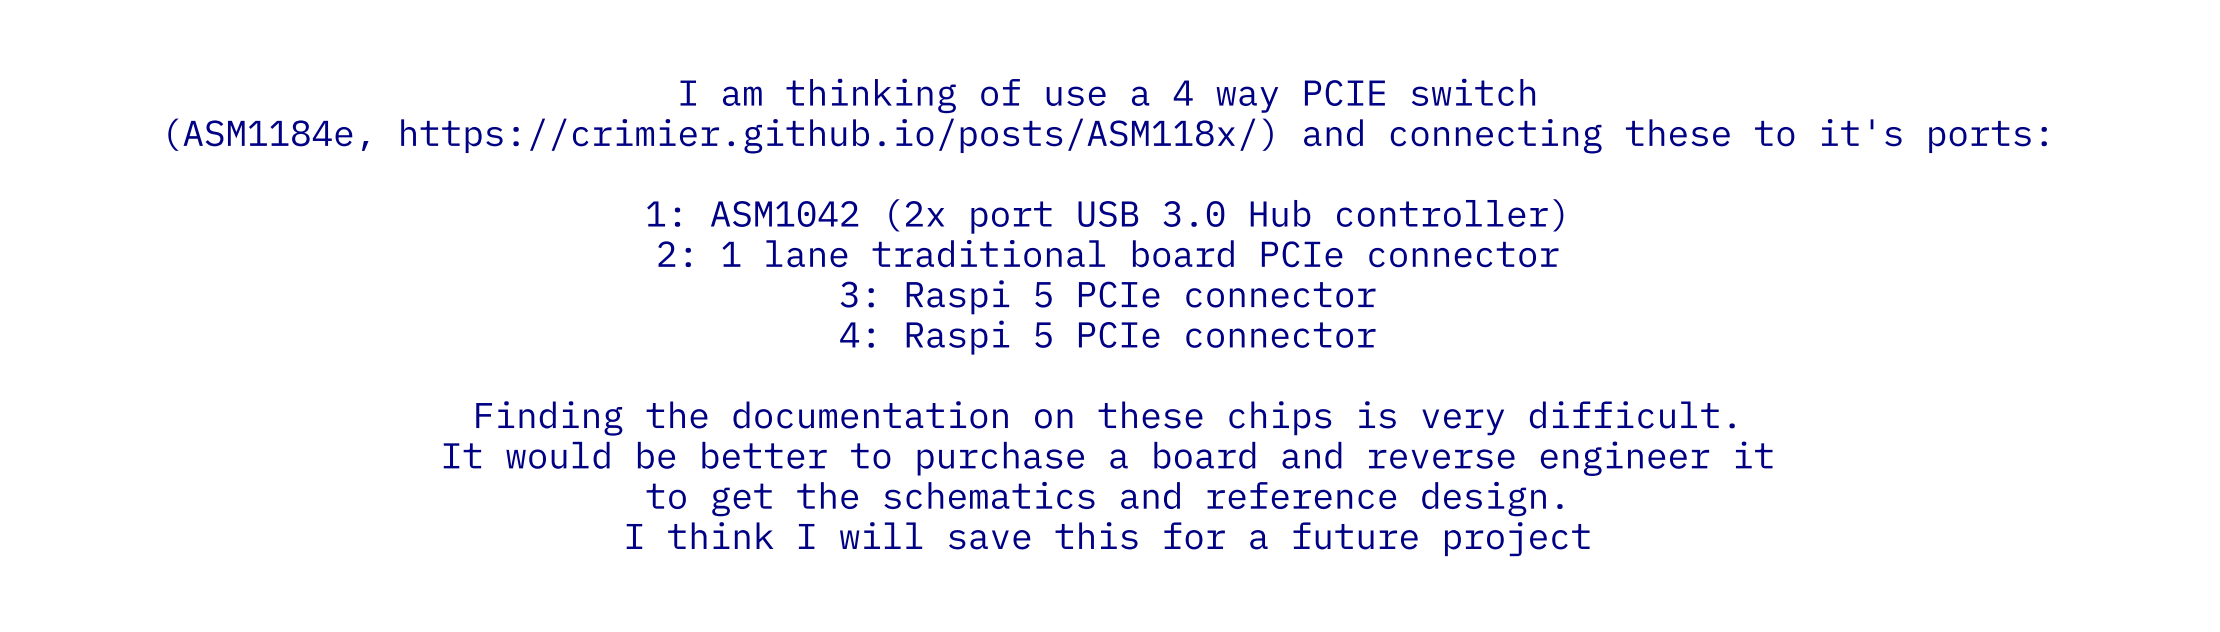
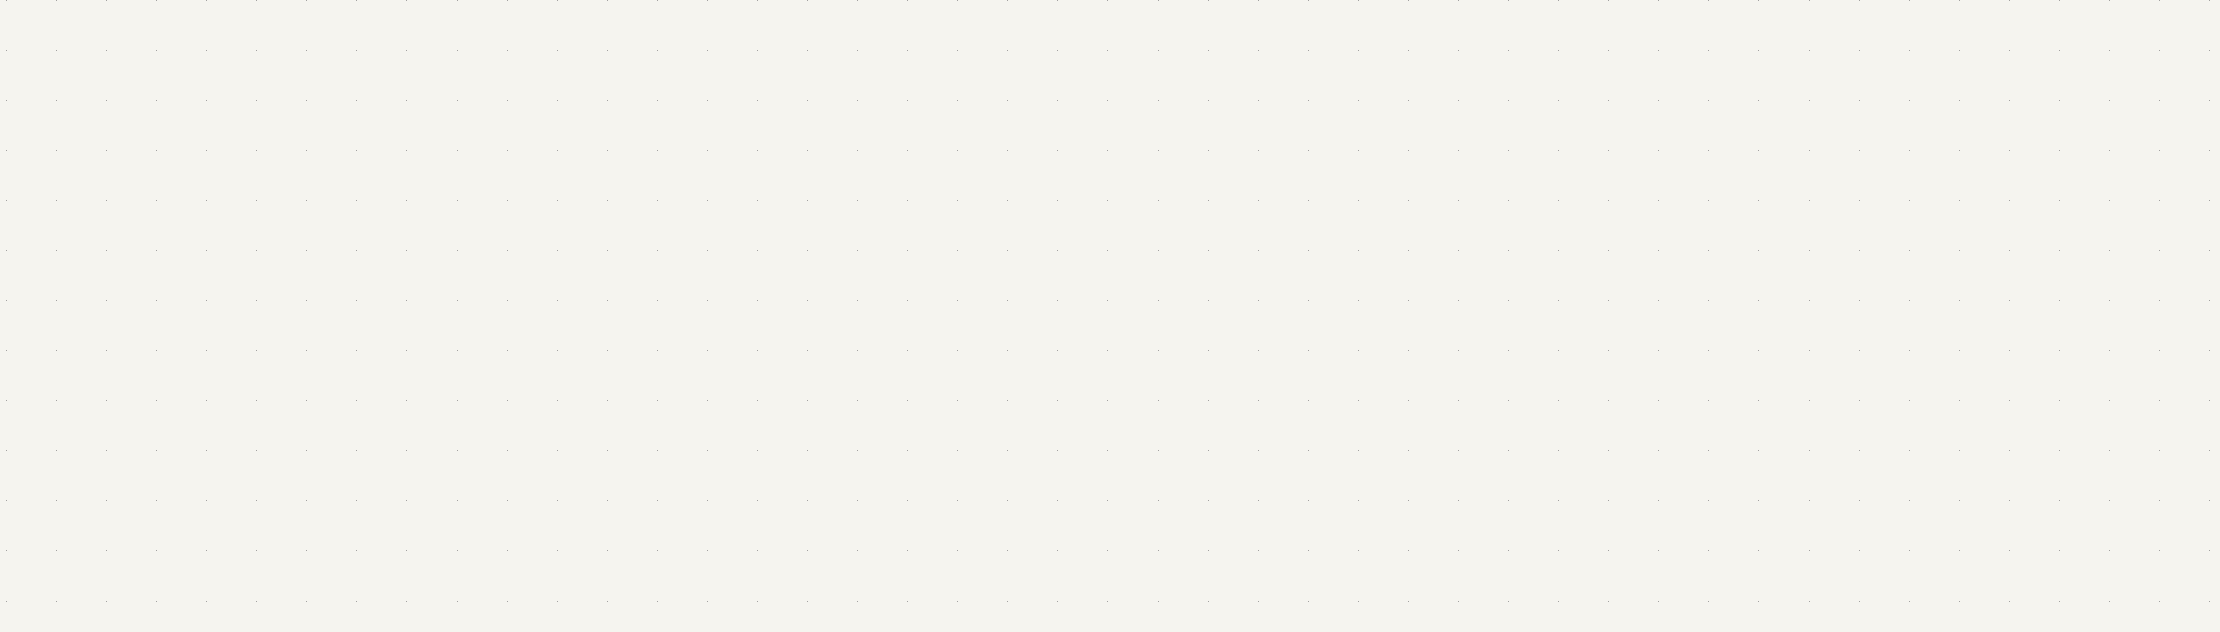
text: I am thinking of use a 4 way PCIE switch (1107, 95) -> none
text: (ASM1184e, https://crimier.github.io/posts/ASM118x/) and connecting these to it's ports: (1107, 136) -> none
text: 1: ASM1042 (2x port USB 3.0 Hub controller) (1105, 216) -> none
text: 2: 1 lane traditional board PCIe connector (1108, 253) -> none
text: 3: Raspi 5 PCIe connector (1108, 297) -> none
text: 4: Raspi 5 PCIe connector (1107, 337) -> none
text: Finding the documentation on these chips is very difficult. (1105, 418) -> none
text: It would be better to purchase a board and reverse engineer it (1108, 458) -> none
text: to get the schematics and reference design. (1104, 499) -> none
text: I think I will save this for a future project (1108, 539) -> none

